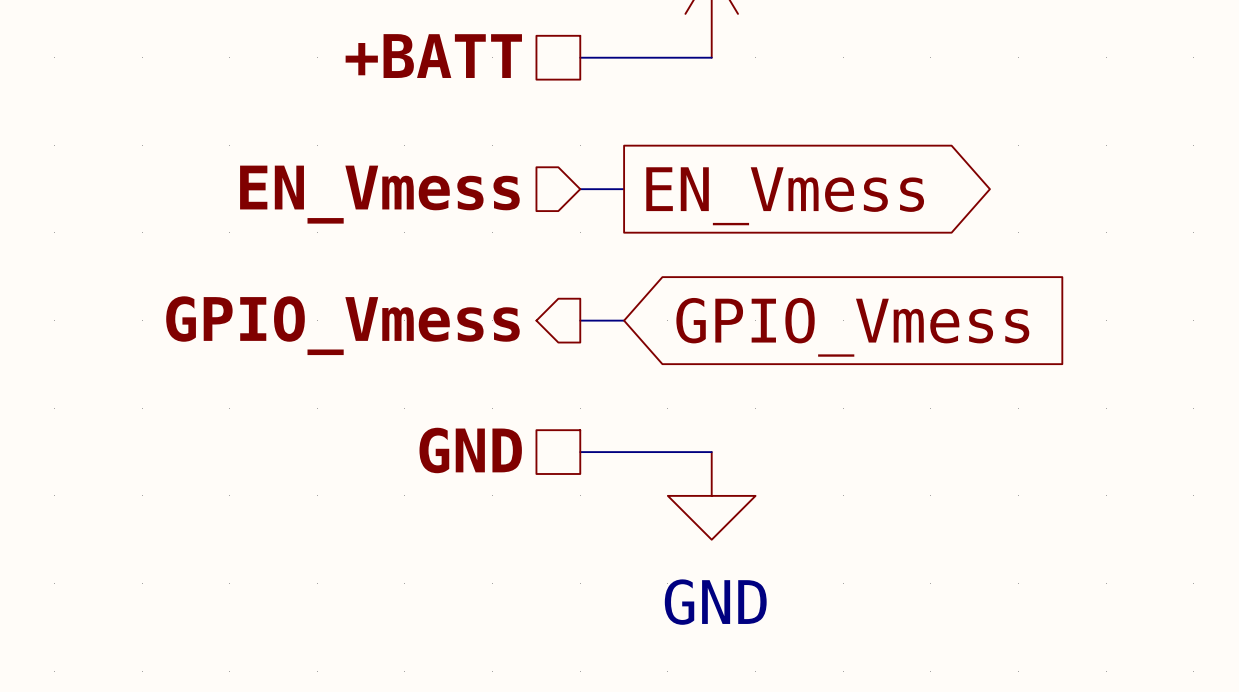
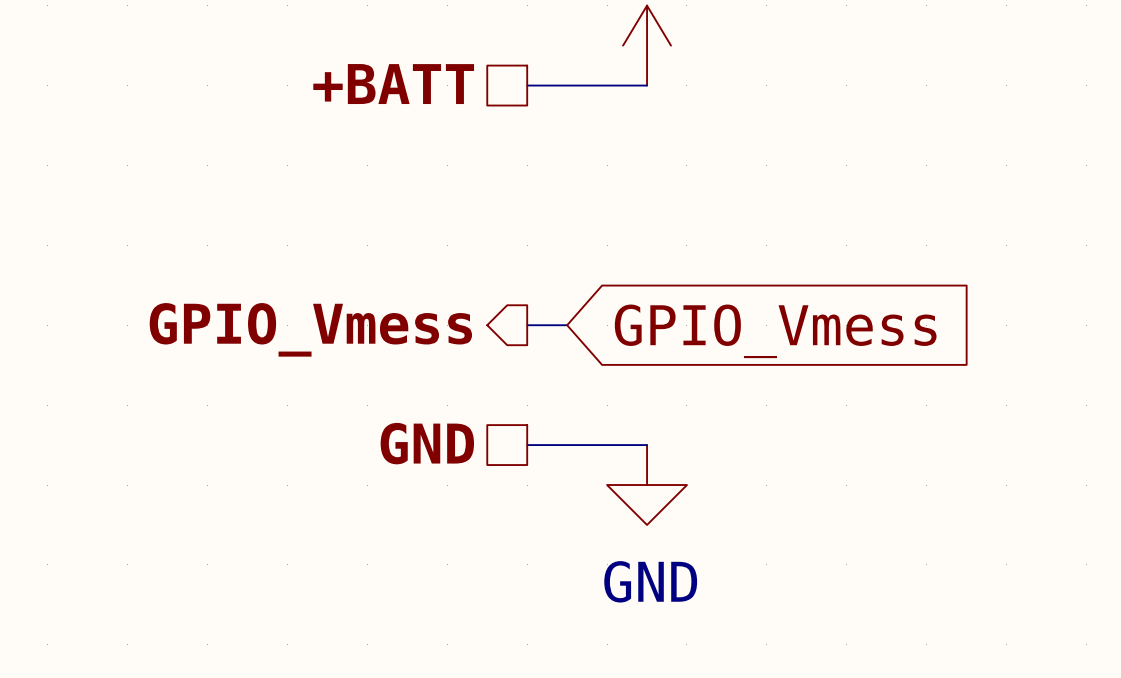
wire: (580, 189) (624, 189) -> none
hierarchical label: EN_Vmess (379, 194) -> none
global label: EN_Vmess (785, 196) -> none

